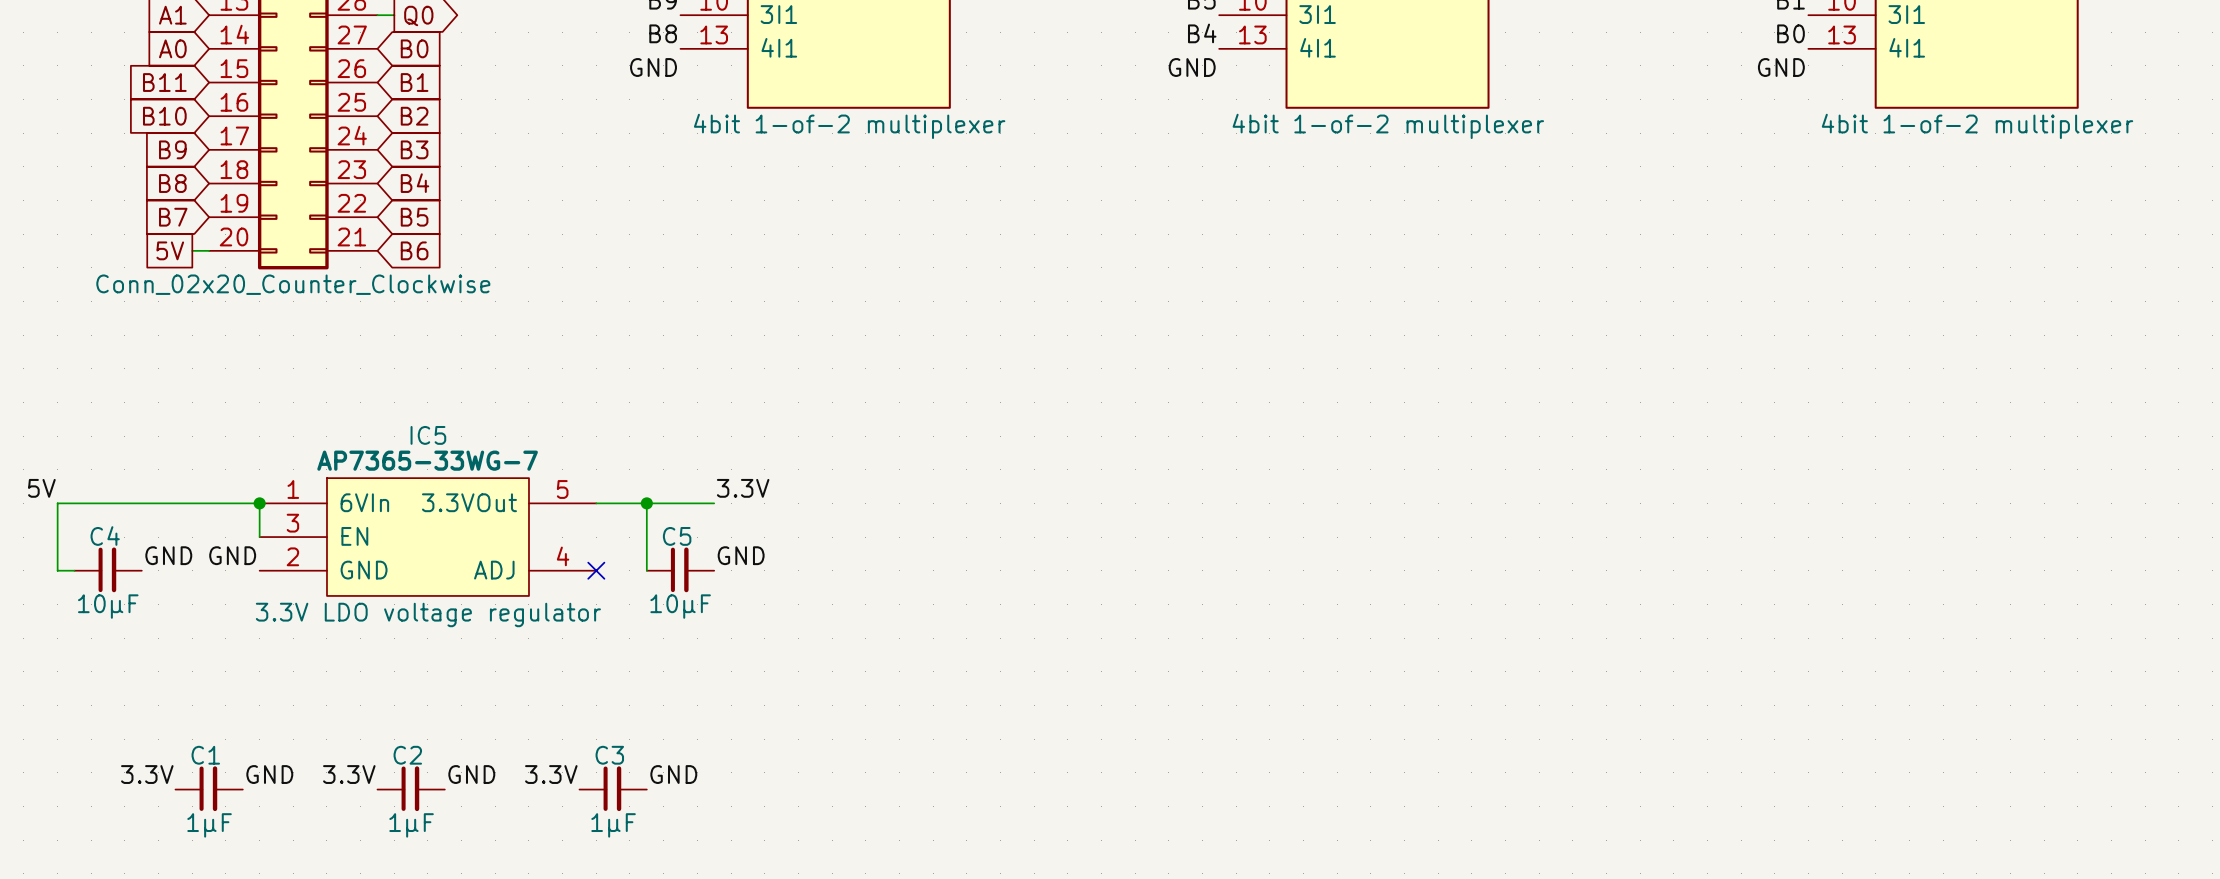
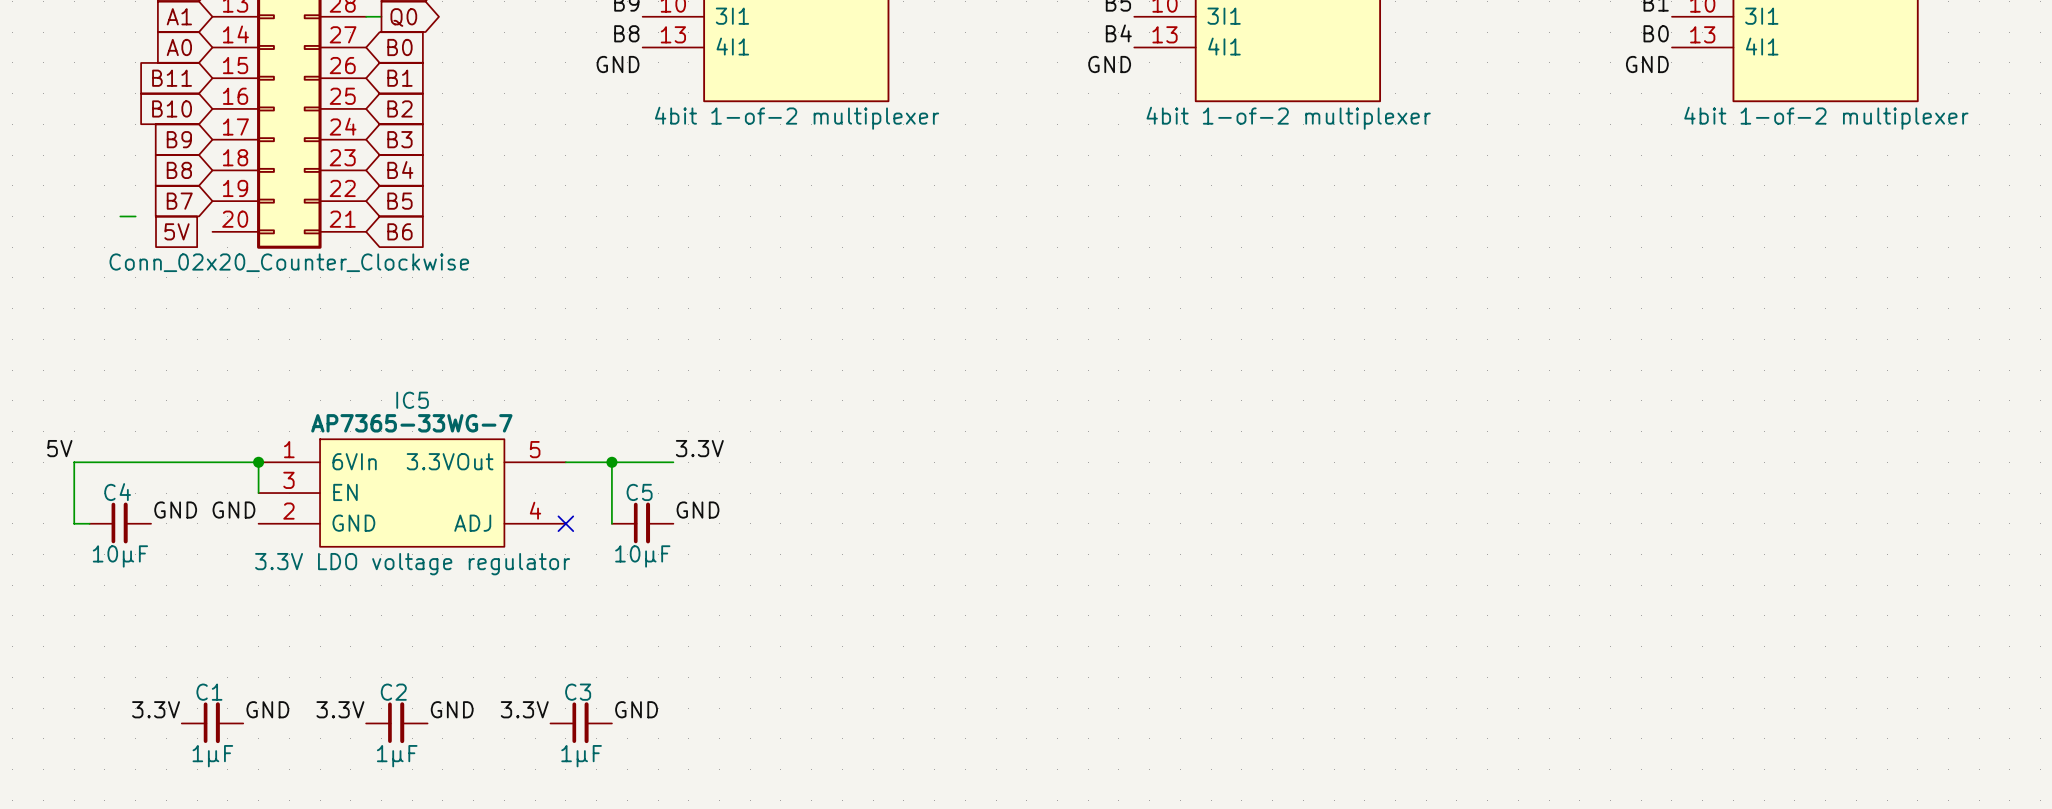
wire: (192, 250) (209, 250) -> (120, 216) (135, 216)

